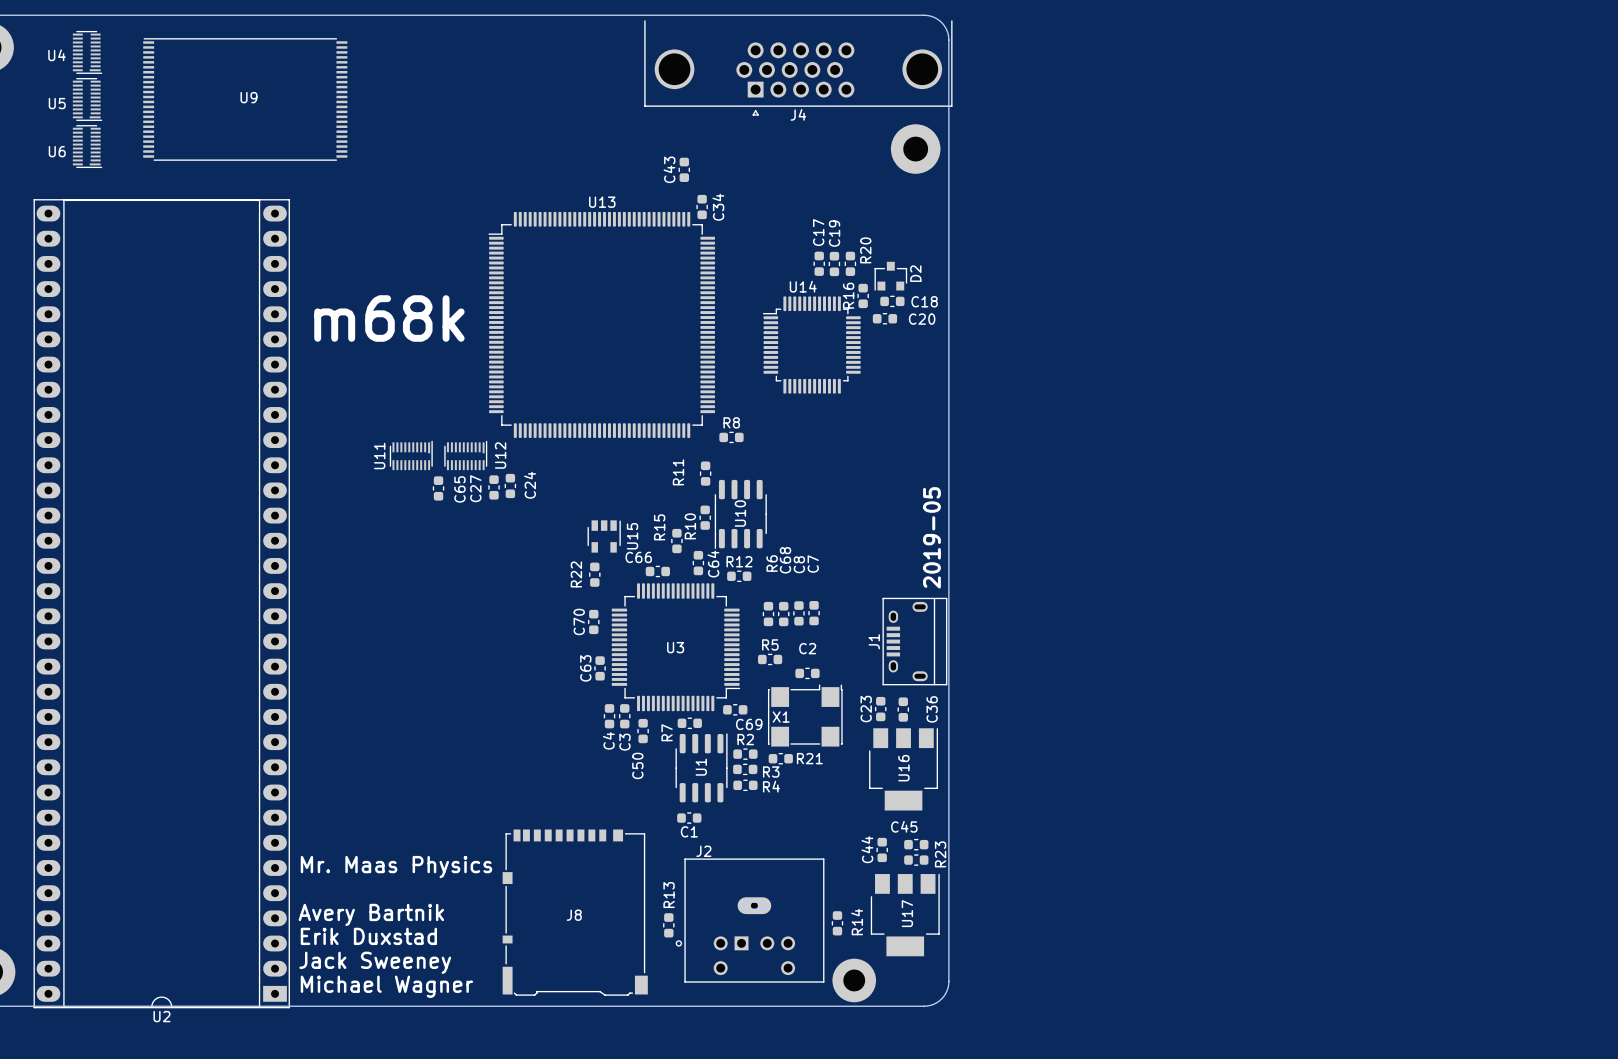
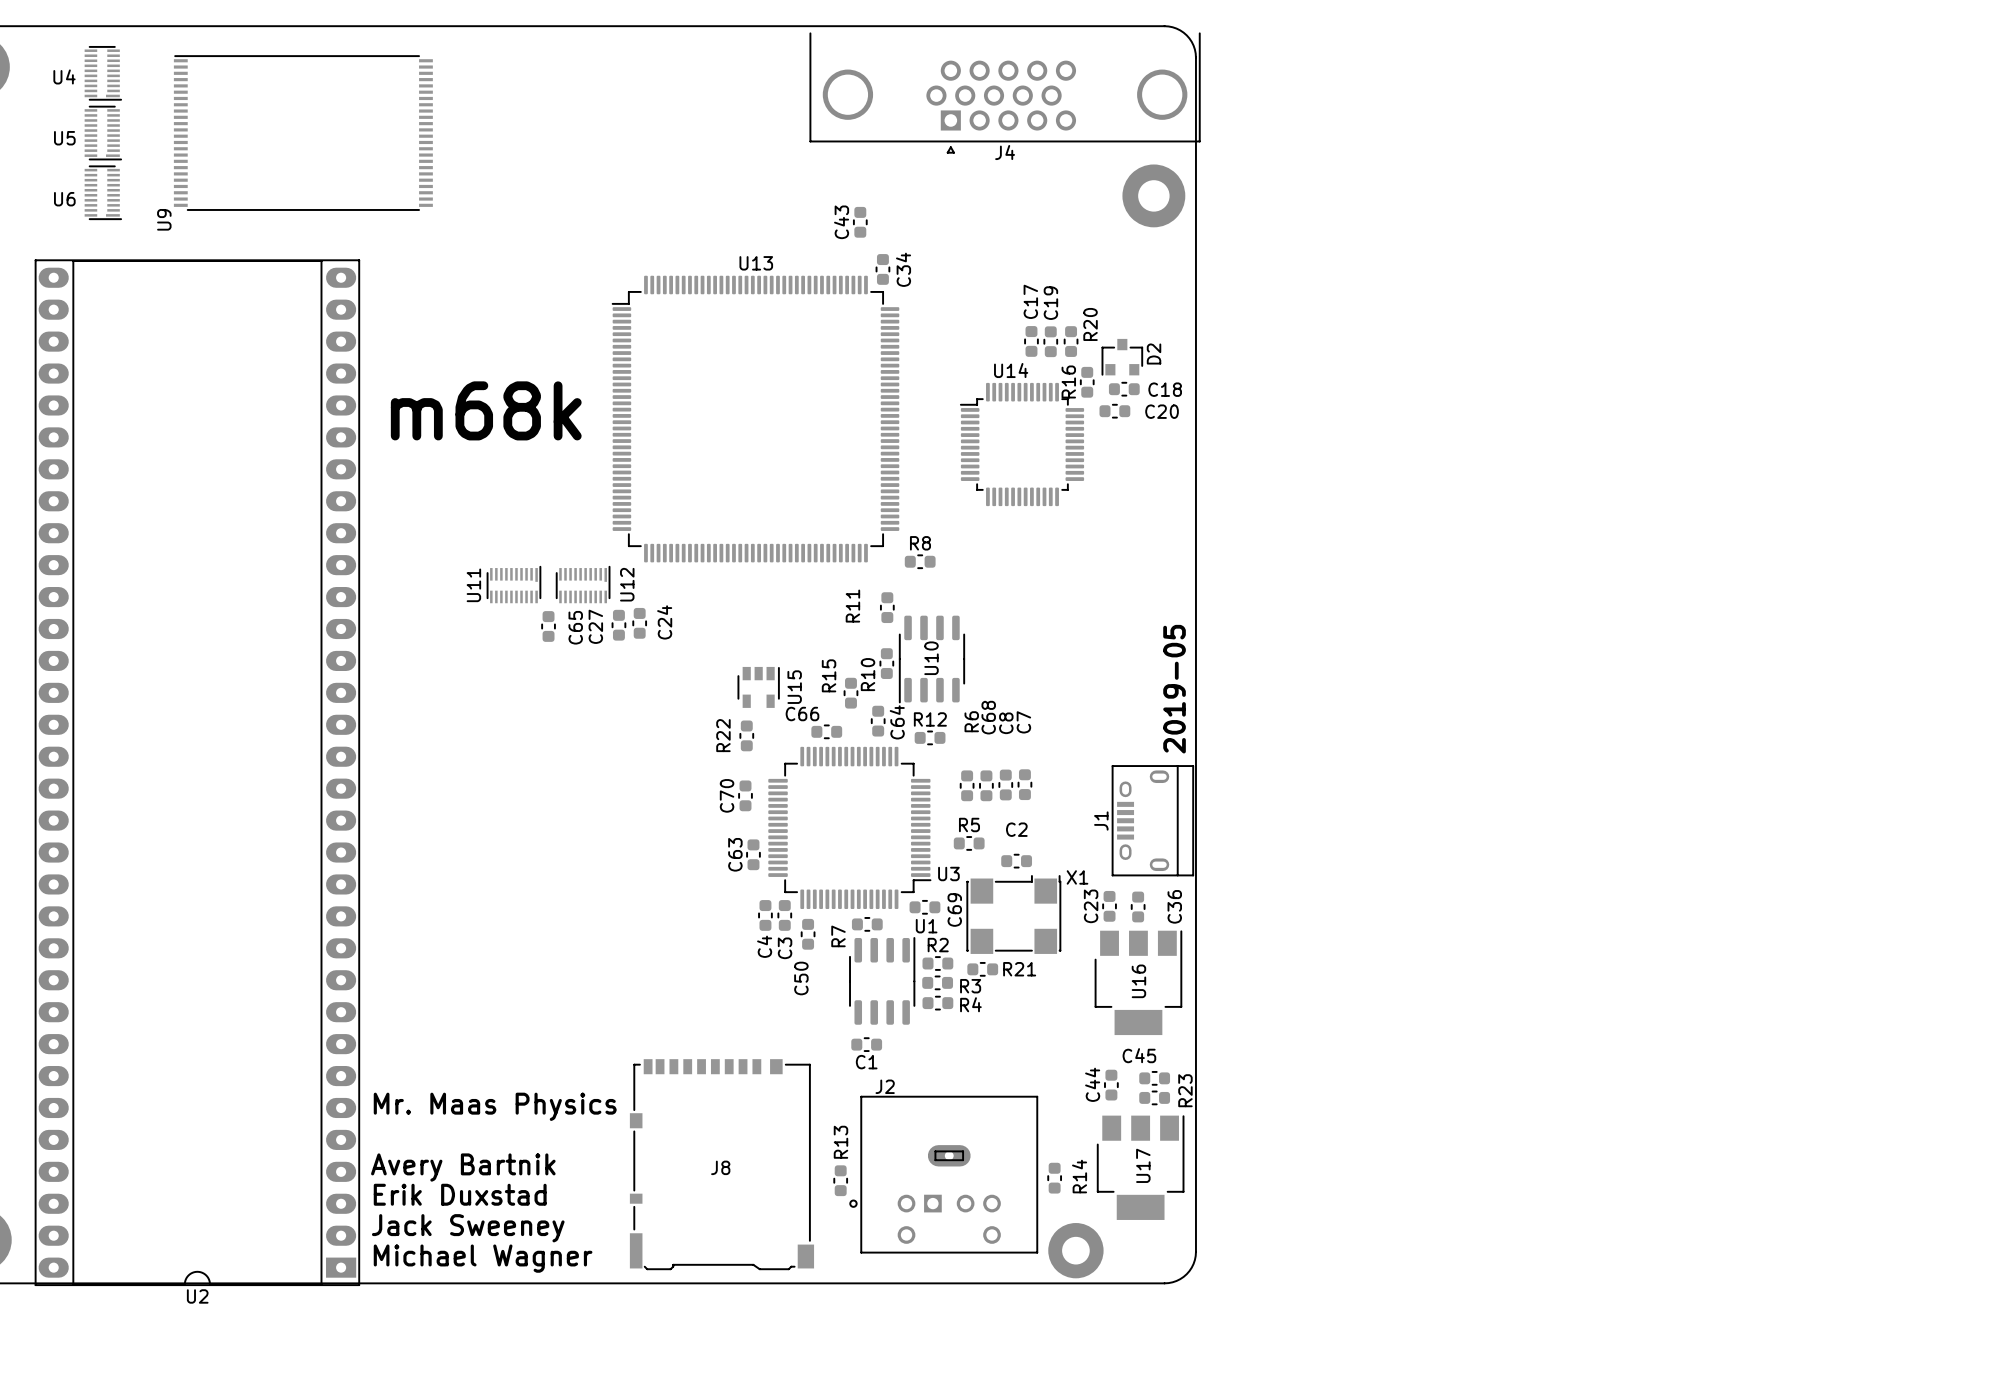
U9 name rotation: 0° (248, 97) -> 90° counterclockwise (164, 219)
U9 name position: U9 (248, 97) -> U9 (164, 219)
U3 name position: U3 (675, 647) -> U3 (948, 873)
X1 name position: X1 (781, 717) -> X1 (1077, 877)
C69 name rotation: 0° (749, 724) -> 90° counterclockwise (954, 909)
U1 name rotation: 0° (701, 767) -> 90° clockwise (926, 926)
U1 name position: U1 (701, 767) -> U1 (926, 926)

